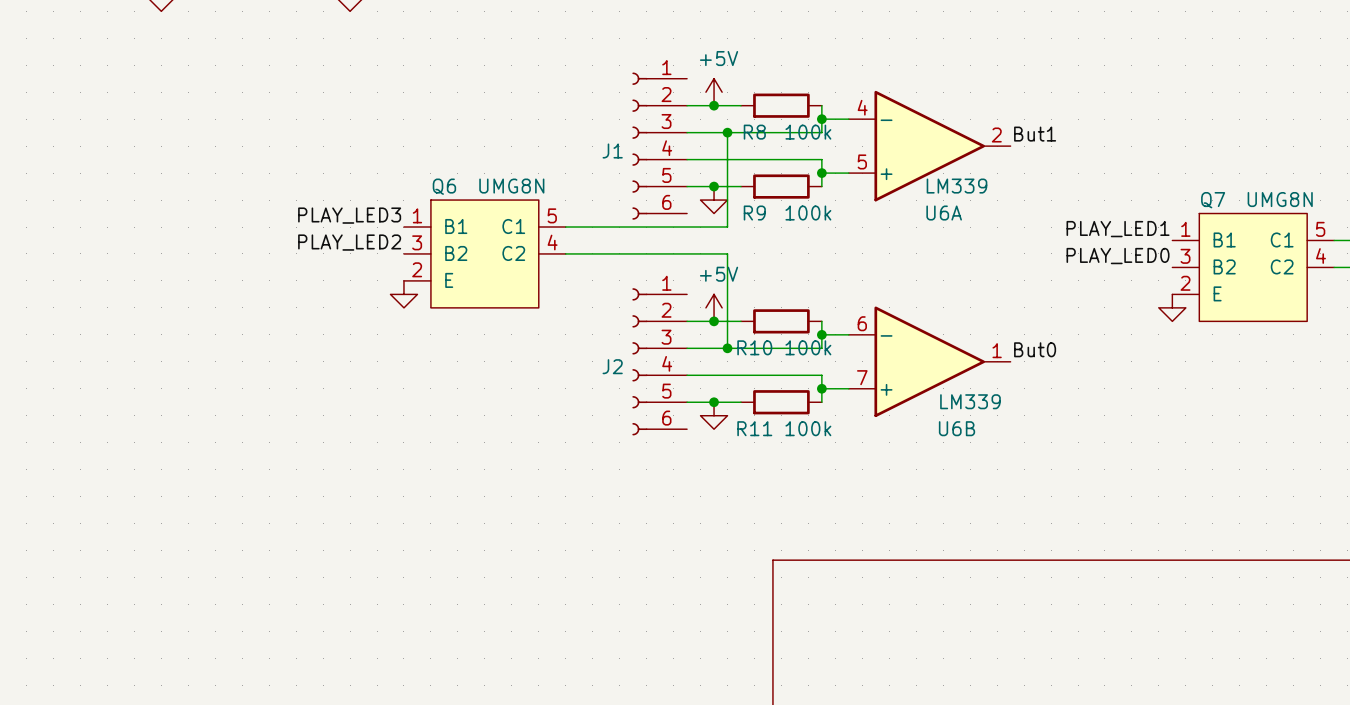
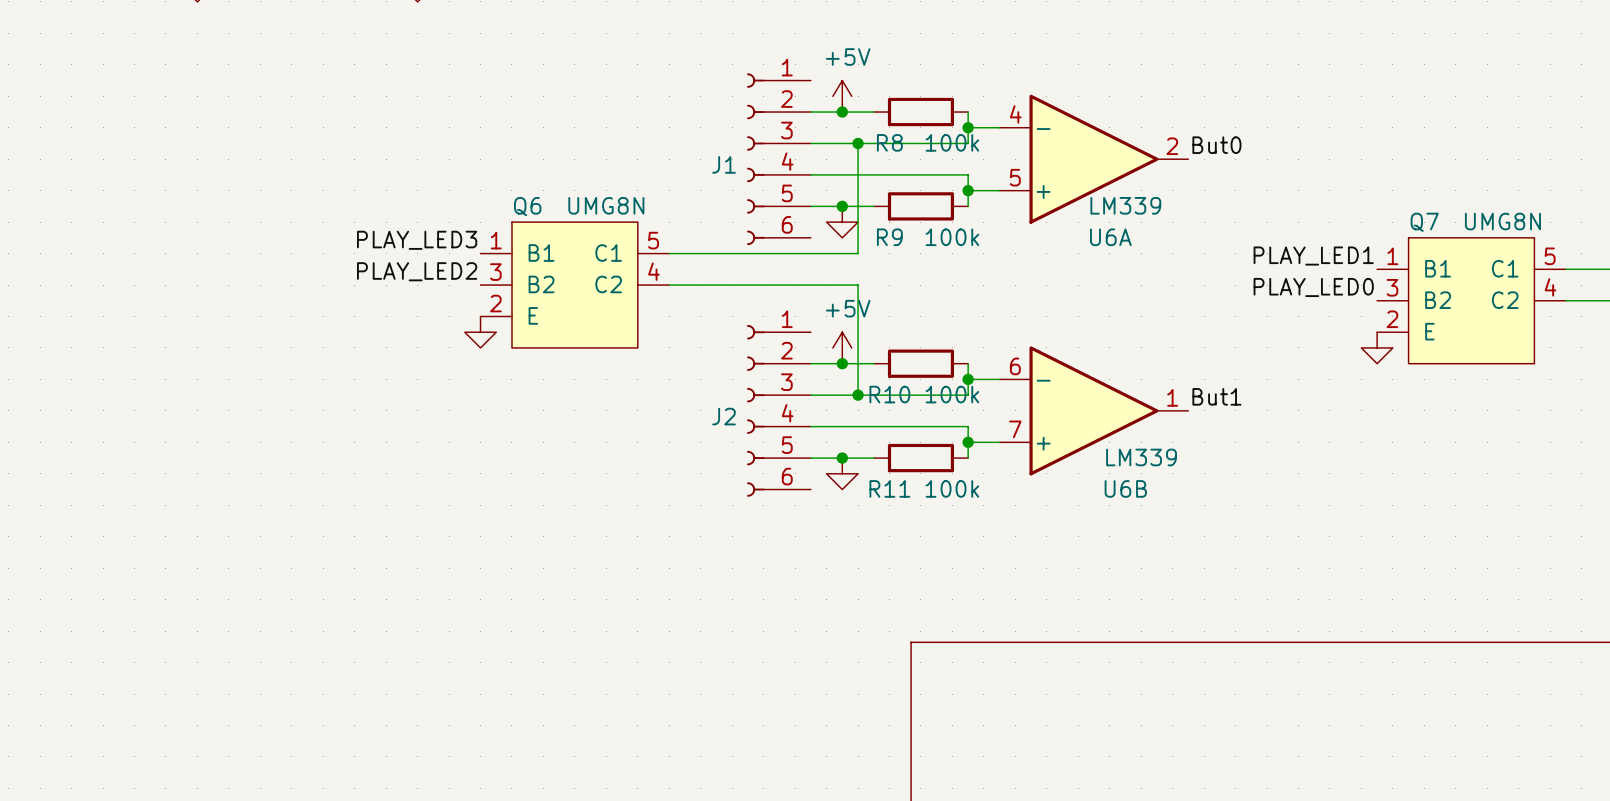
label: But1 (1035, 134) -> But0 (1216, 145)
label: But0 (1035, 349) -> But1 (1216, 396)

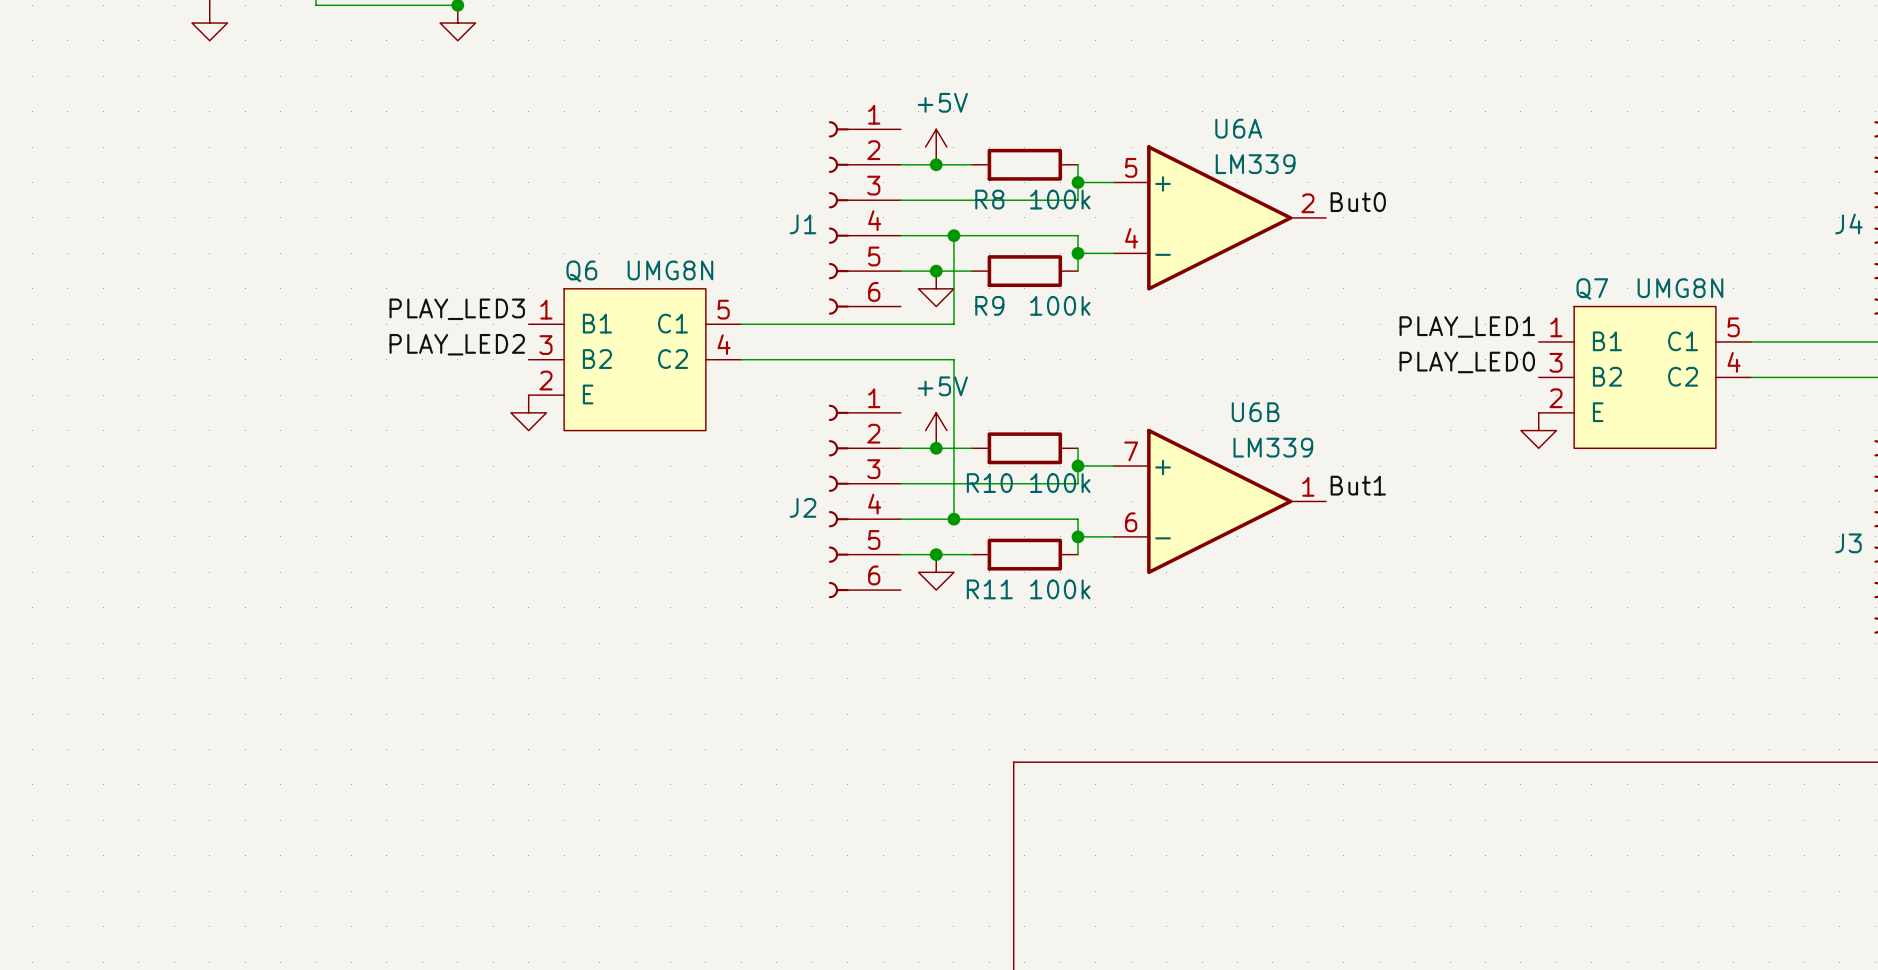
wire: (858, 143) (858, 174) -> (953, 483) (953, 519)
junction position: (858, 143) -> (953, 235)
U6A flip: as is (1093, 159) -> up-down (1219, 217)
junction position: (858, 395) -> (953, 519)
U6B flip: as is (1093, 410) -> up-down (1219, 501)

